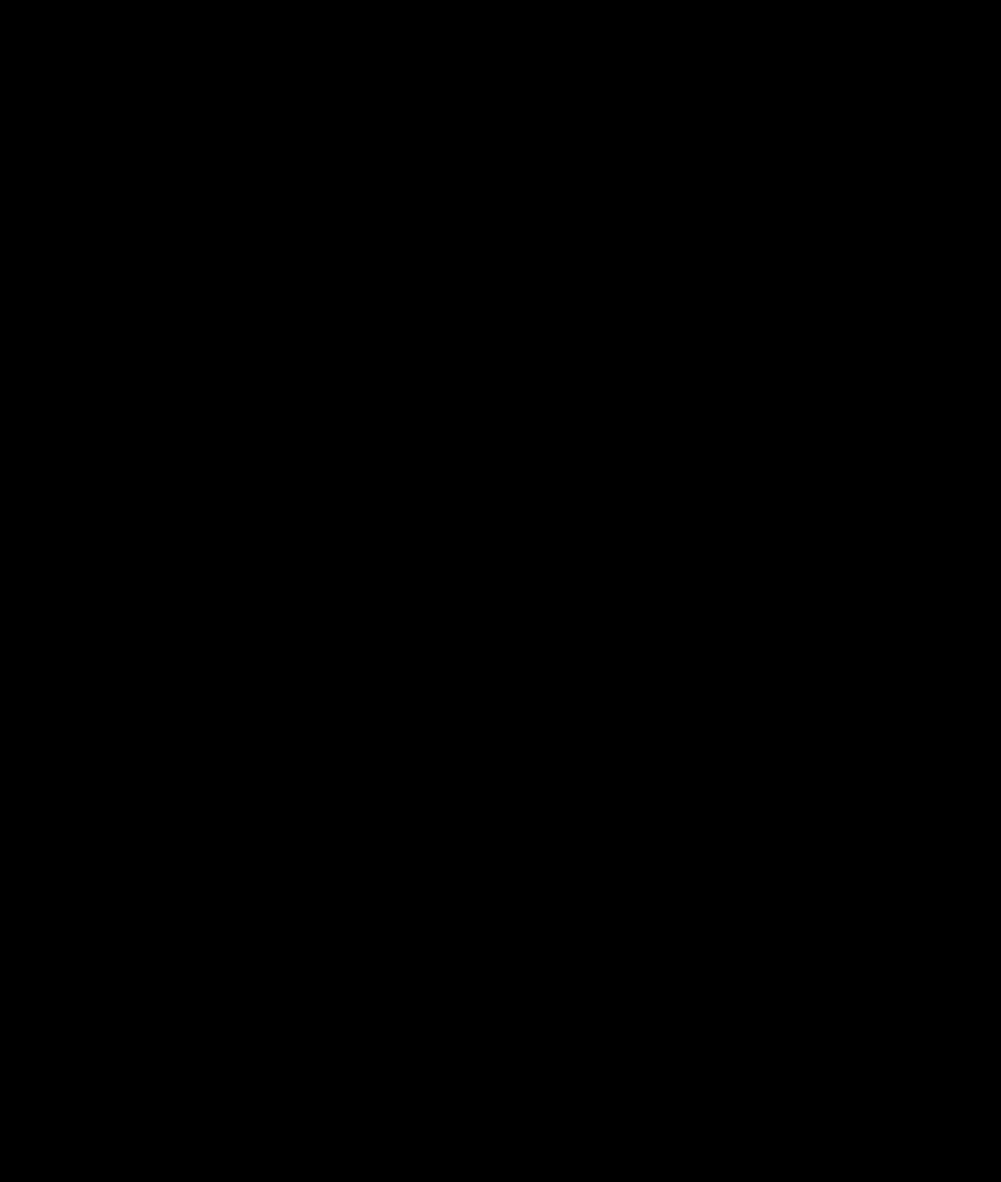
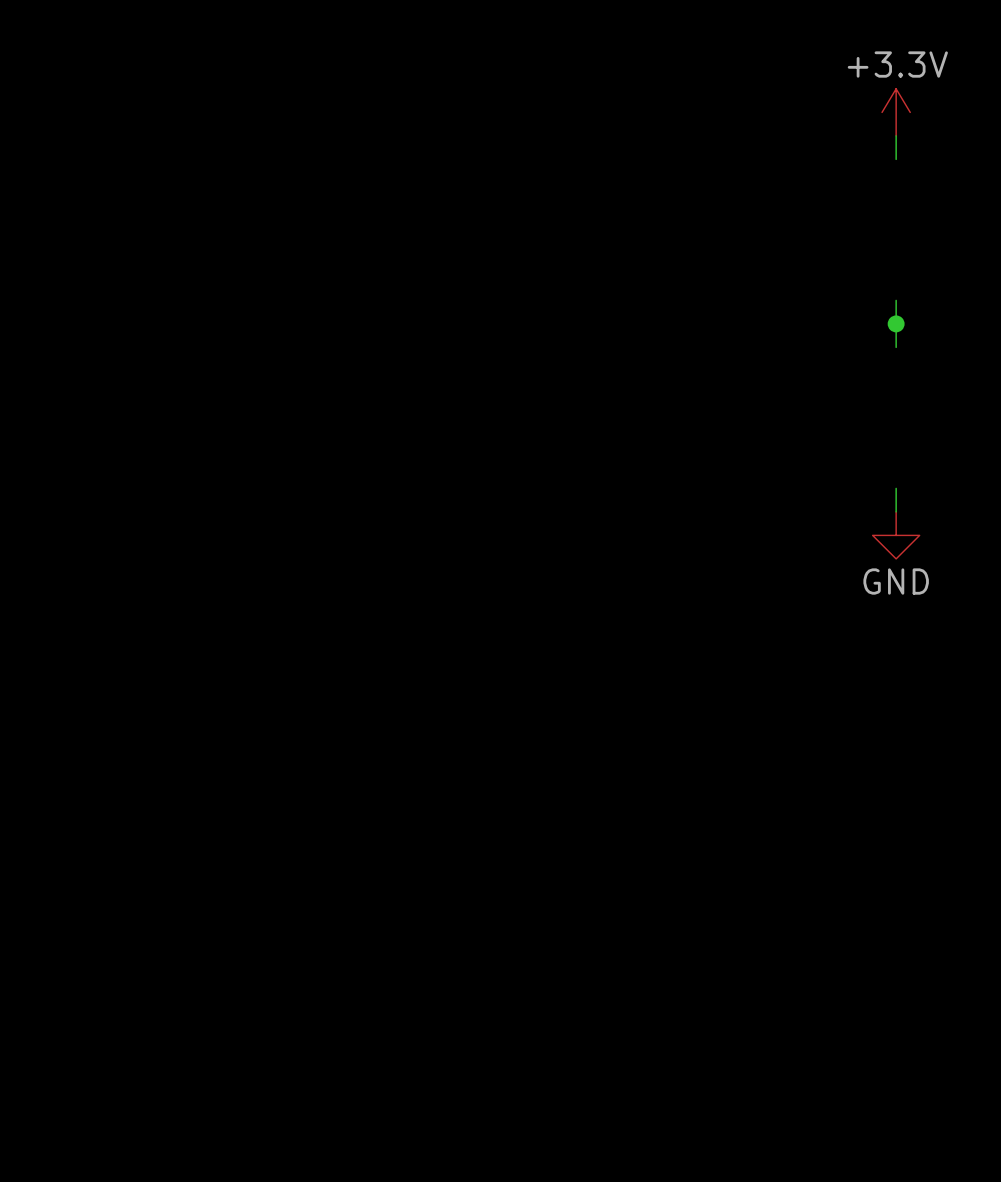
power symbol: none -> +3.3V (896, 112)
wire: none -> (896, 135) (896, 159)
wire: none -> (896, 300) (896, 347)
junction: none -> (896, 323)
wire: none -> (896, 488) (896, 511)
power symbol: none -> GND (896, 535)

